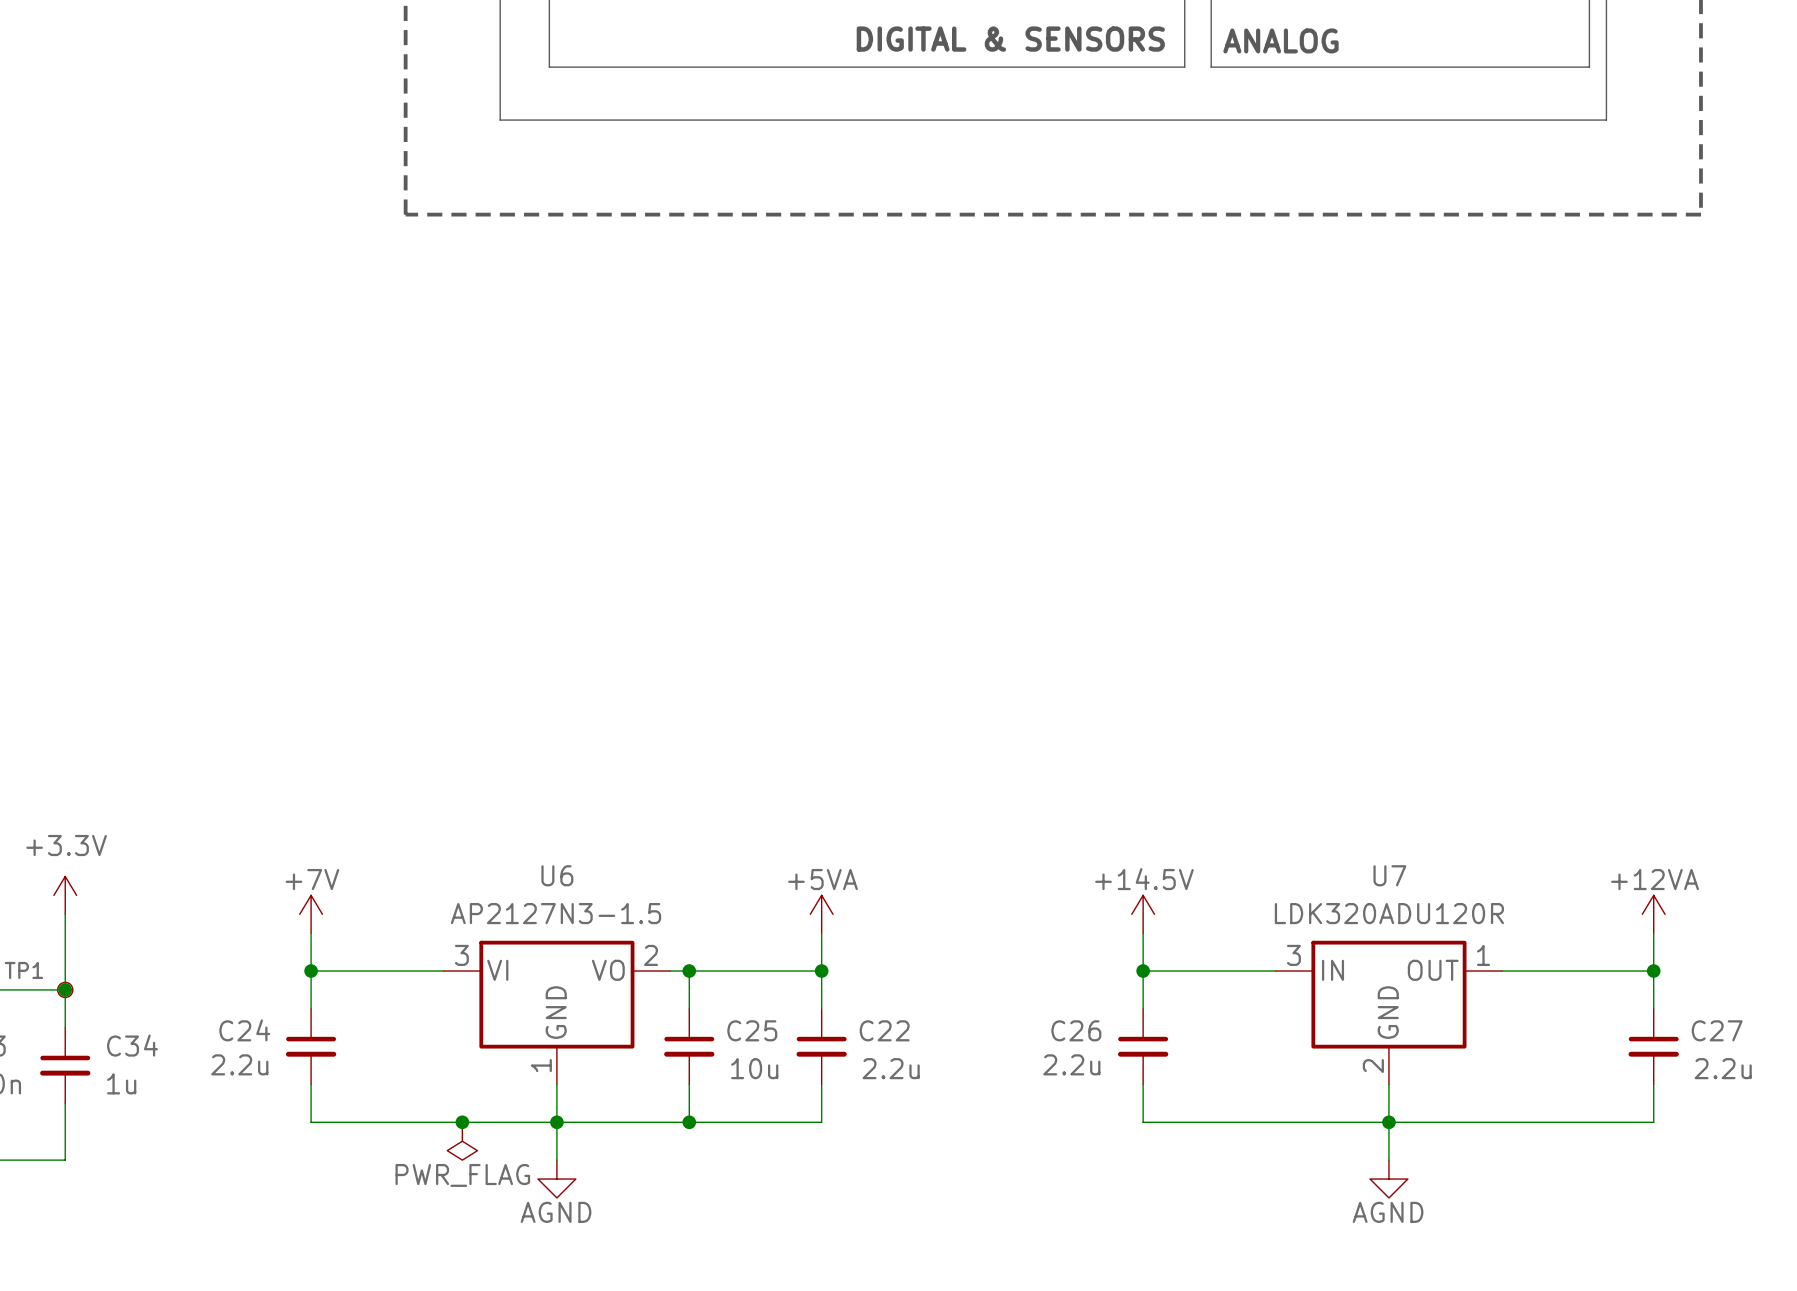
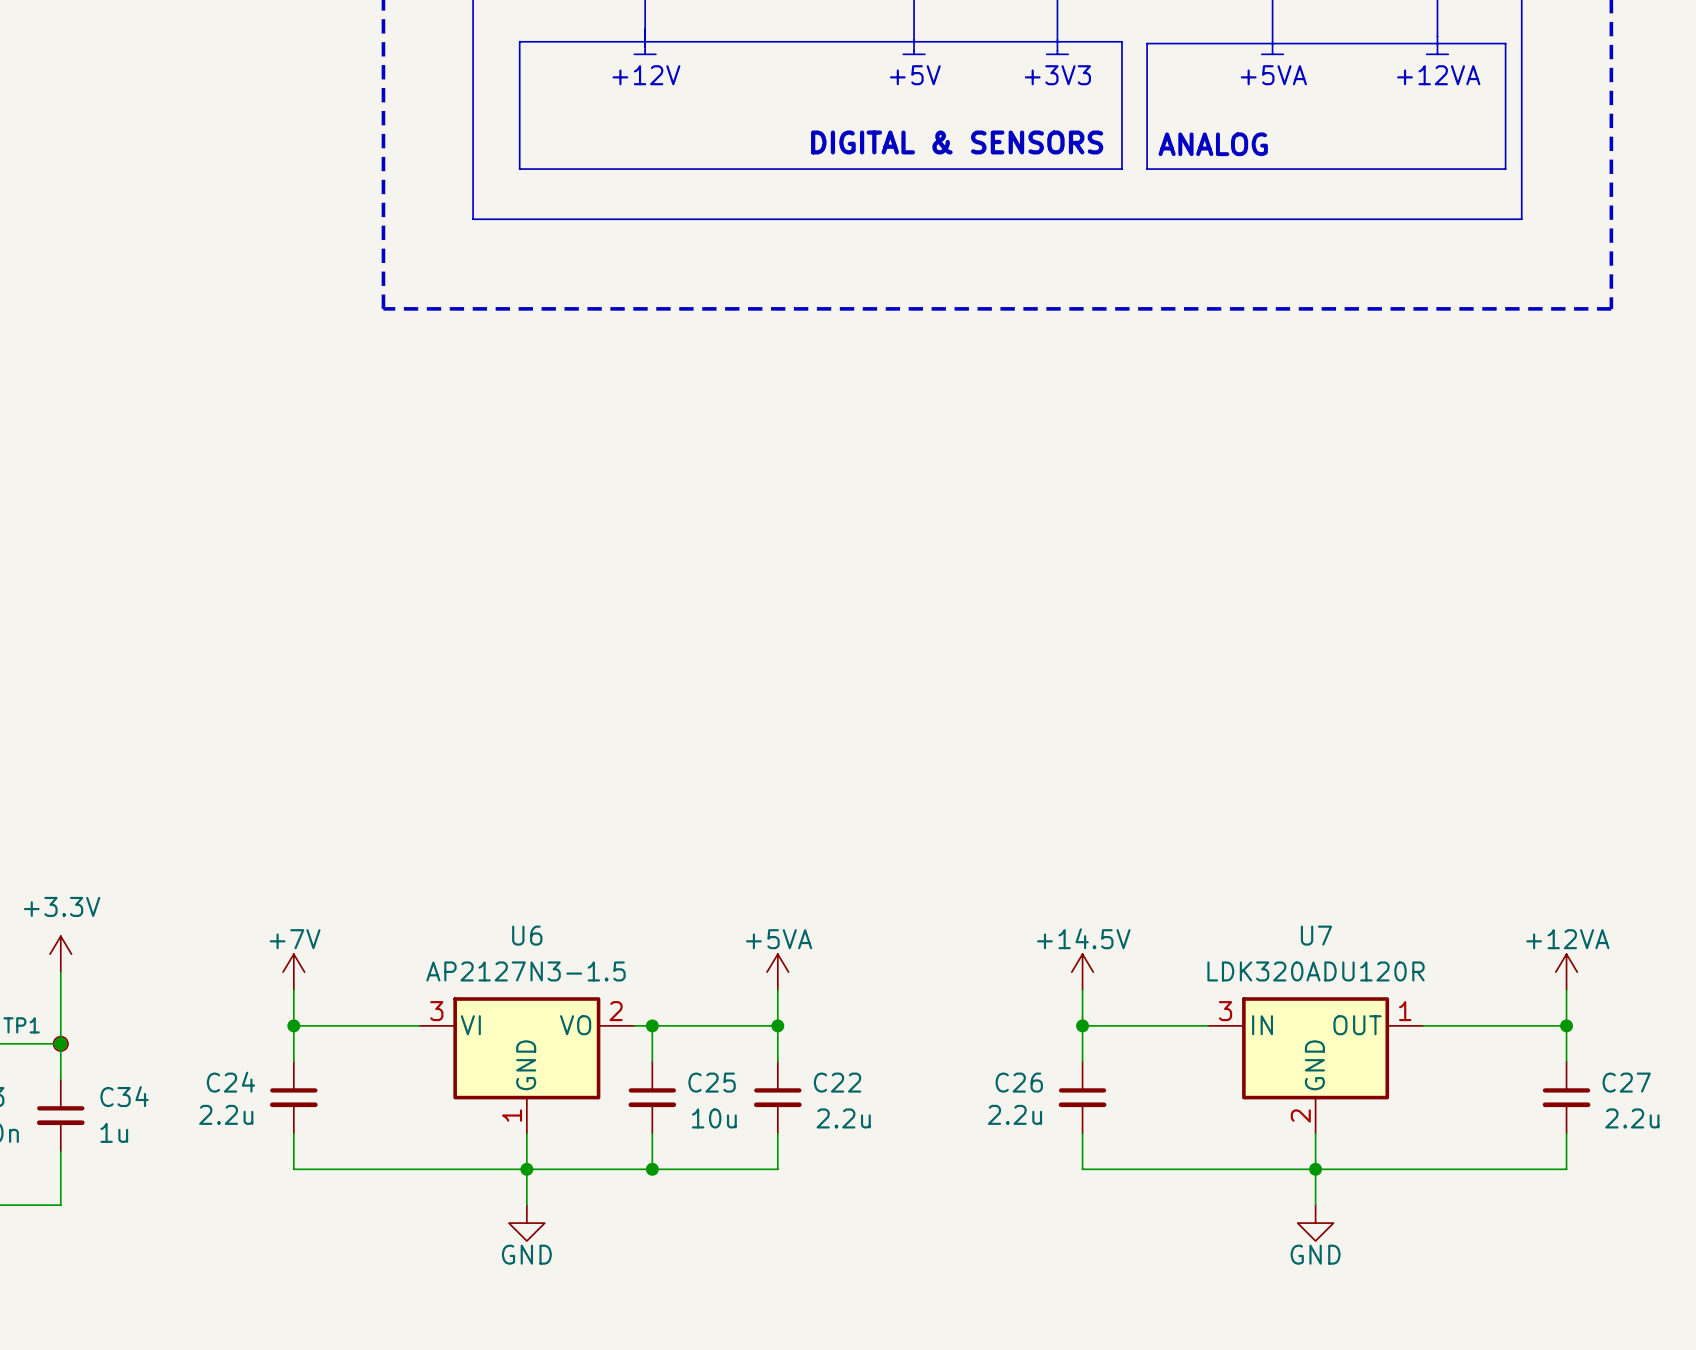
junction: (462, 1122) -> none
power symbol: PWR_FLAG (462, 1141) -> none
power symbol: AGND (556, 1179) -> GND (526, 1223)
power symbol: AGND (1388, 1179) -> GND (1315, 1223)

